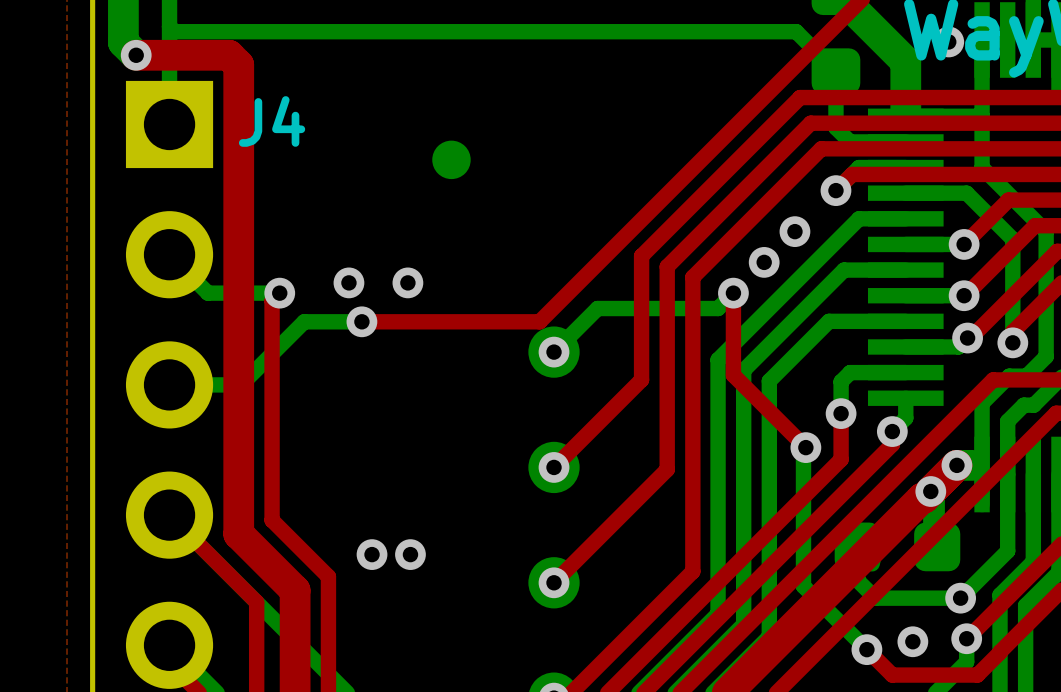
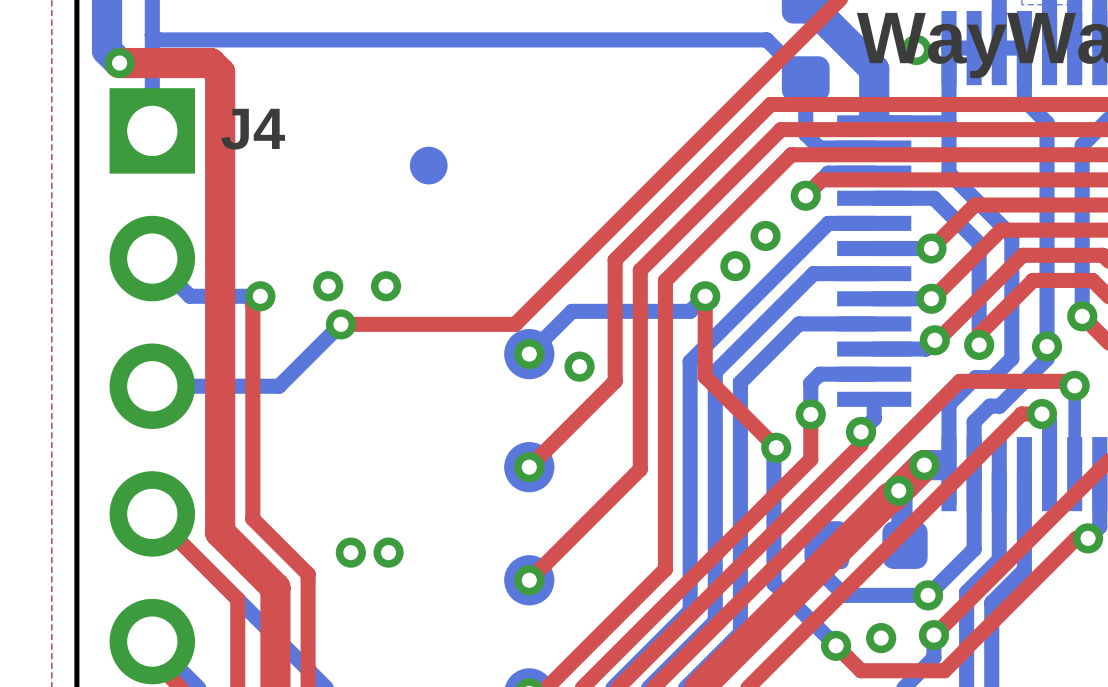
bottom track: (361, 321) (304, 321) (241, 384) -> (340, 324) (279, 386) (222, 386)
via: none -> (579, 366)

